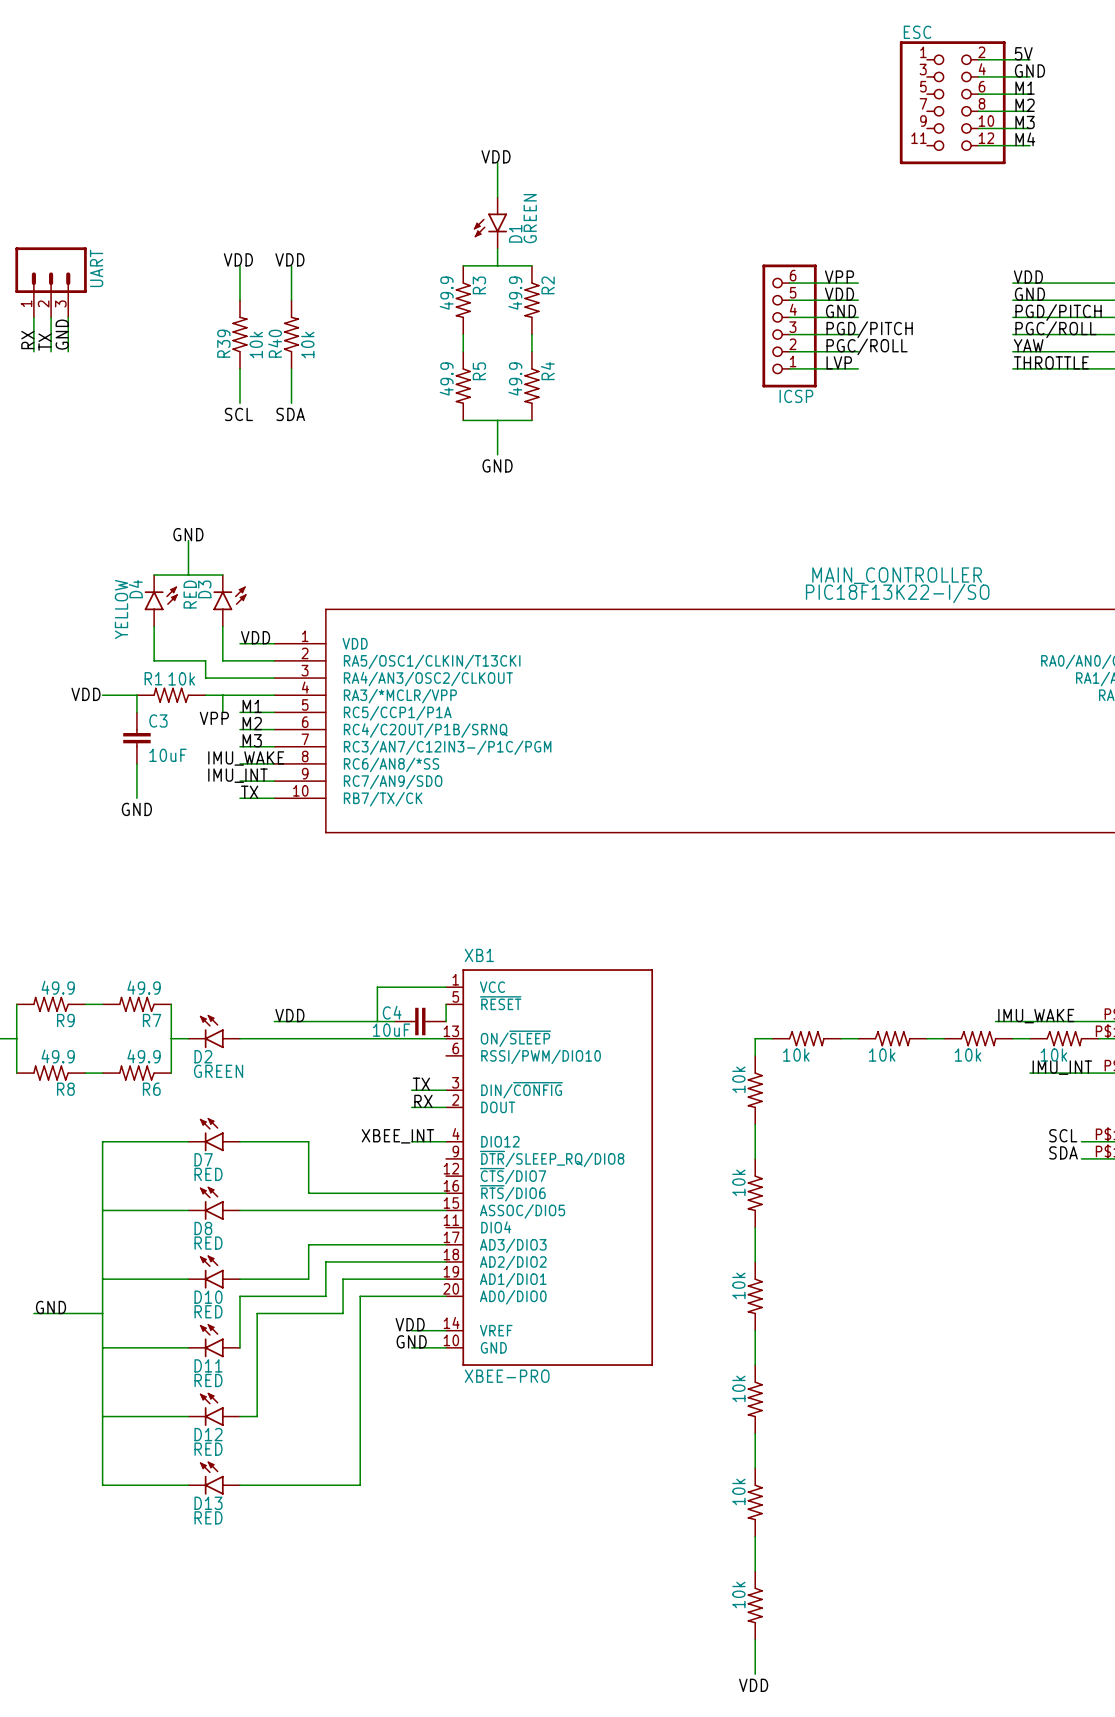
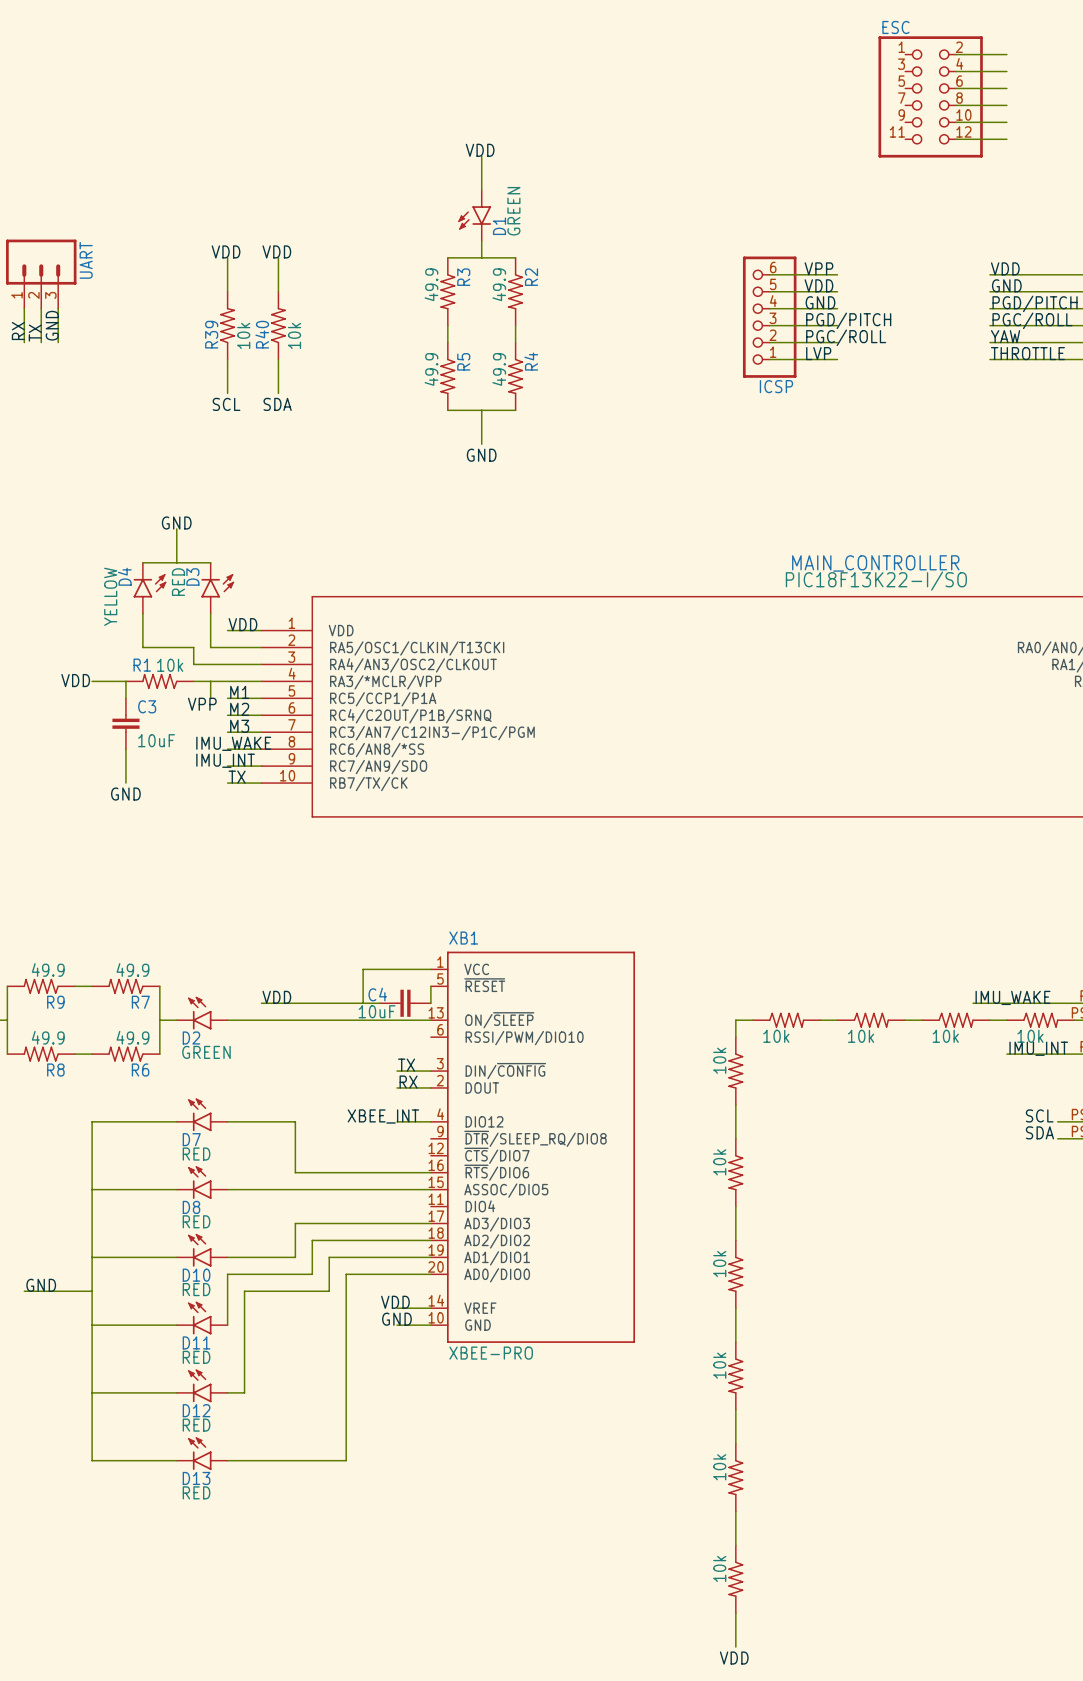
label: 5V (1023, 53) -> none
label: GND (1029, 70) -> none
label: M1 (1025, 88) -> none
label: M2 (1025, 105) -> none
label: M3 (1025, 122) -> none
label: M4 (1025, 139) -> none

